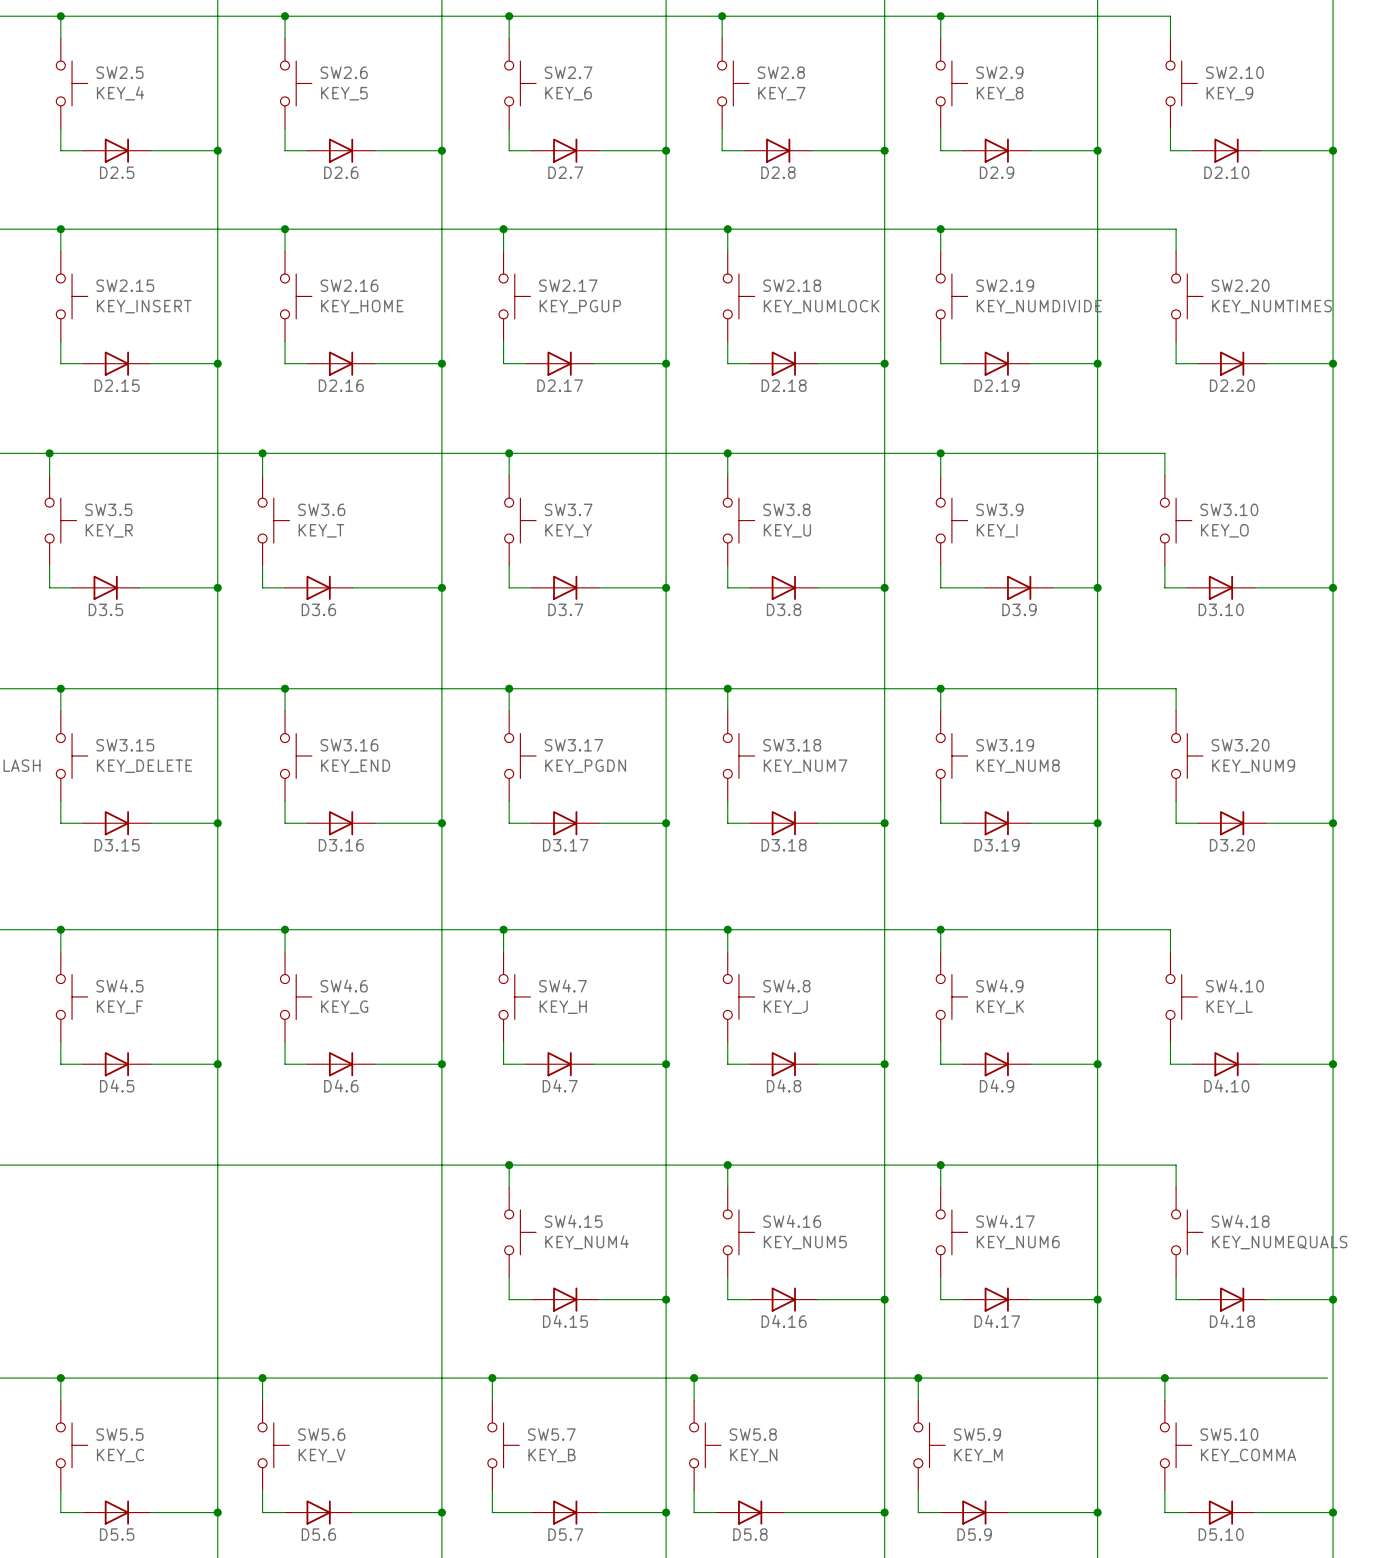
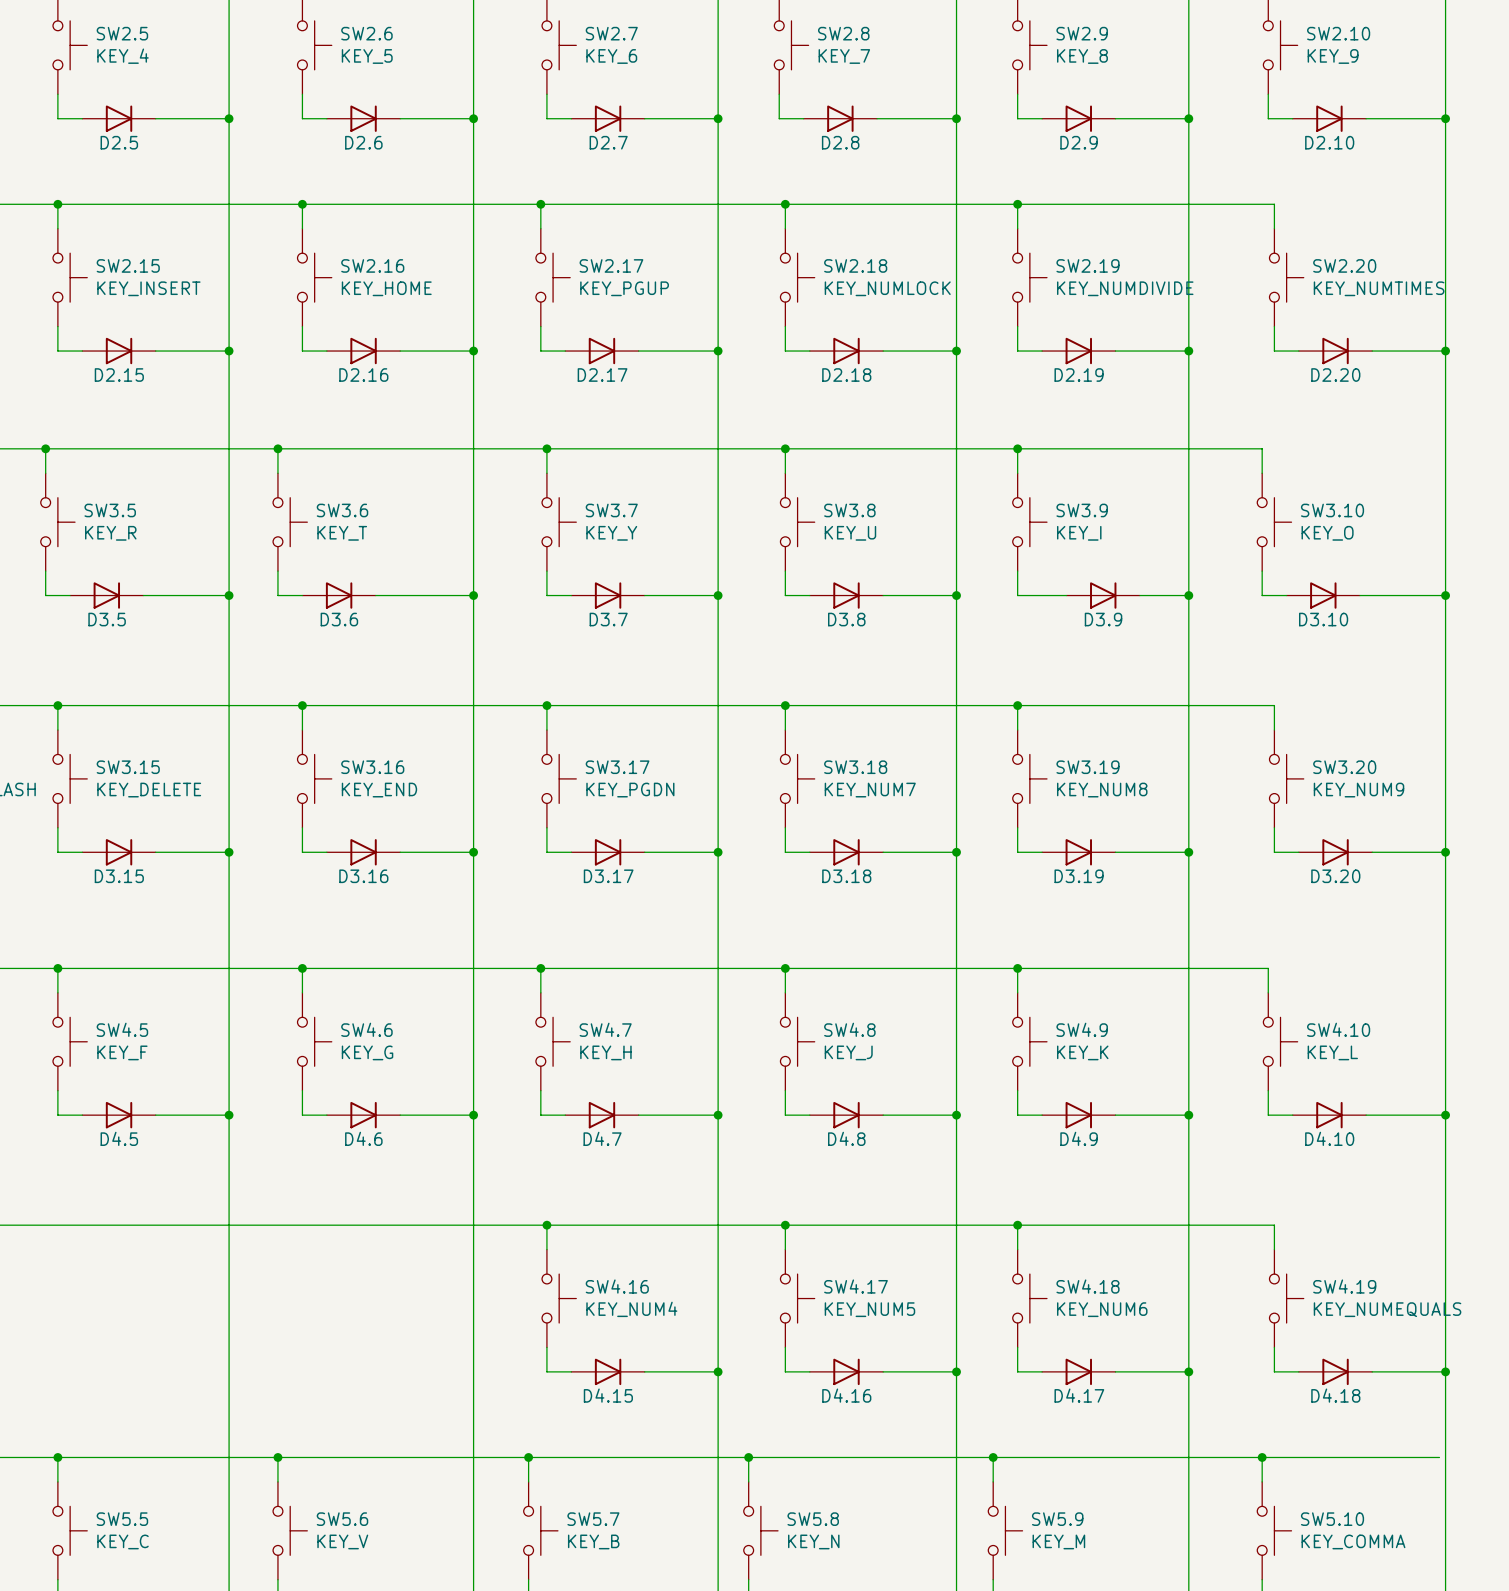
SW4.15 name: SW4.15 (573, 1221) -> SW4.16 (617, 1286)
SW4.16 name: SW4.16 (792, 1221) -> SW4.17 (855, 1286)
SW4.17 name: SW4.17 (1005, 1221) -> SW4.18 (1087, 1286)
SW4.18 name: SW4.18 (1240, 1221) -> SW4.19 (1344, 1286)

